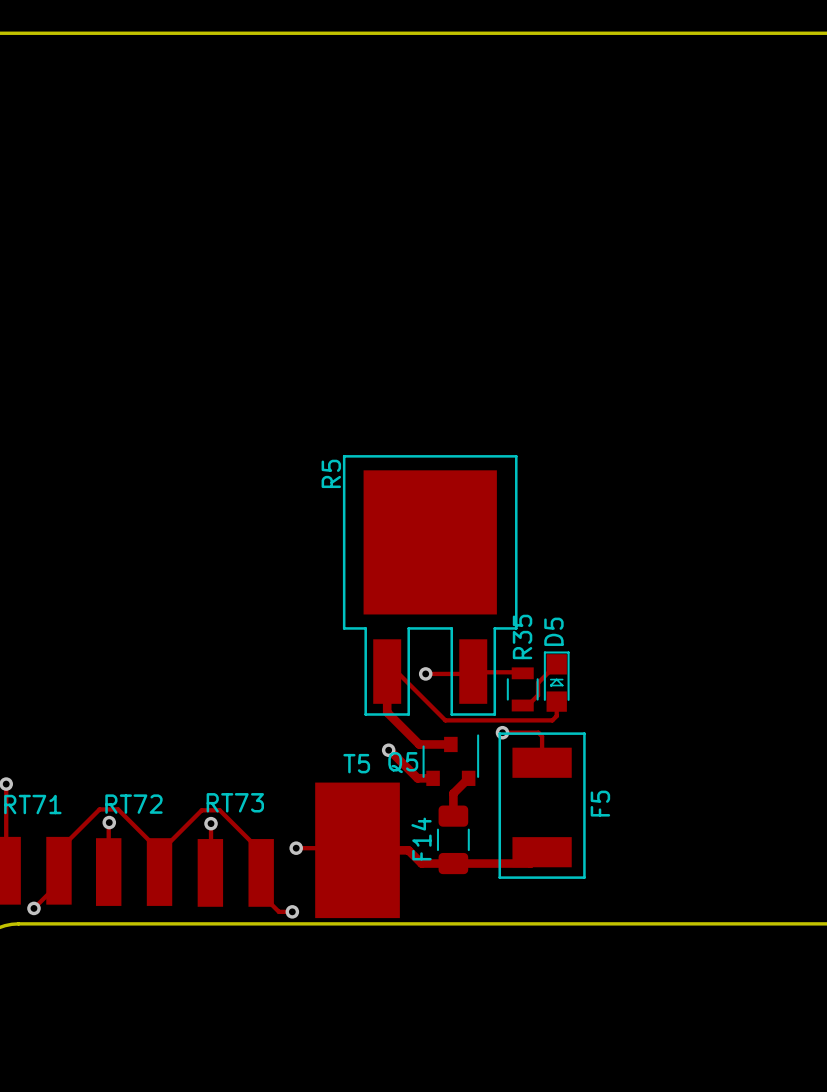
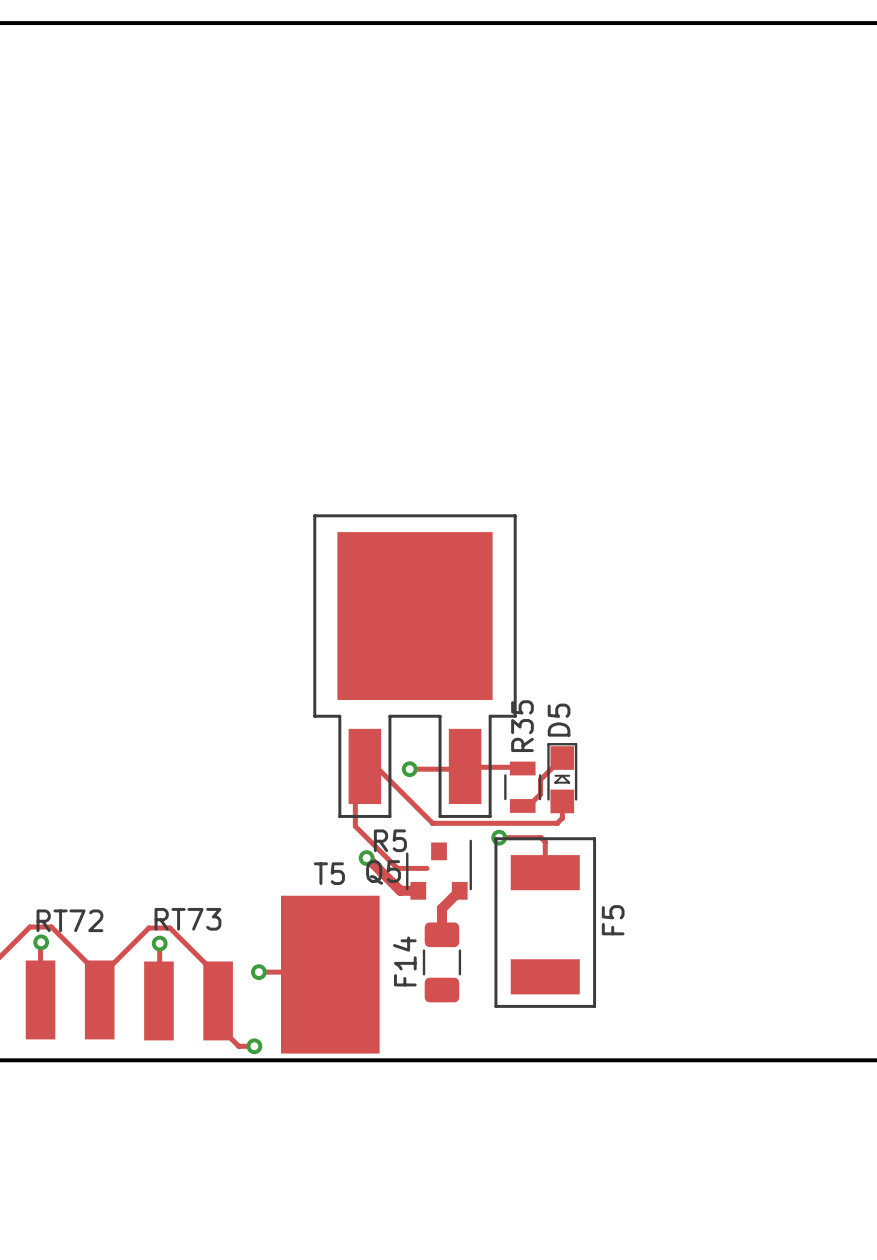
R5 name rotation: 0° (331, 473) -> 90° clockwise (390, 840)
R5 name position: R5 (331, 473) -> R5 (390, 840)
track: (387, 671) (387, 712) (419, 744) (450, 744) -> none
track: none -> (355, 767) (355, 826) (397, 868) (426, 868)
track: (357, 850) (408, 850) (421, 863) (530, 863) (542, 852) -> none

